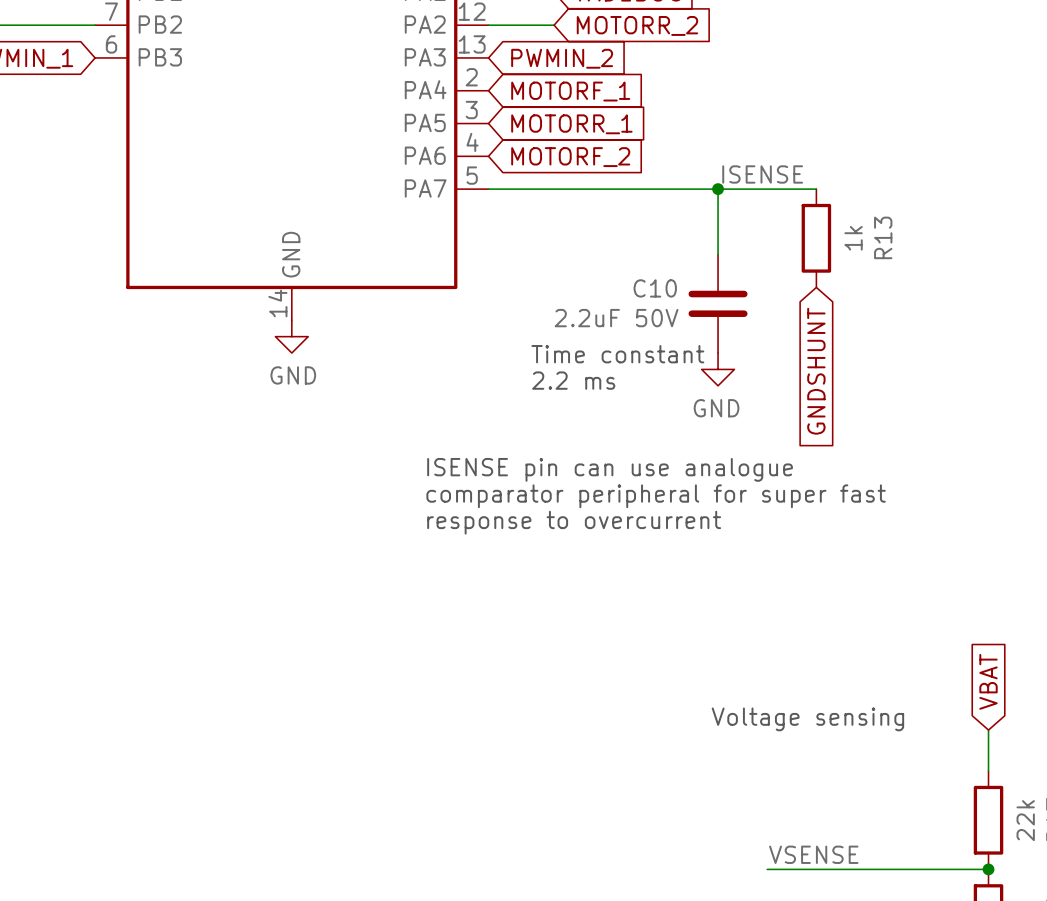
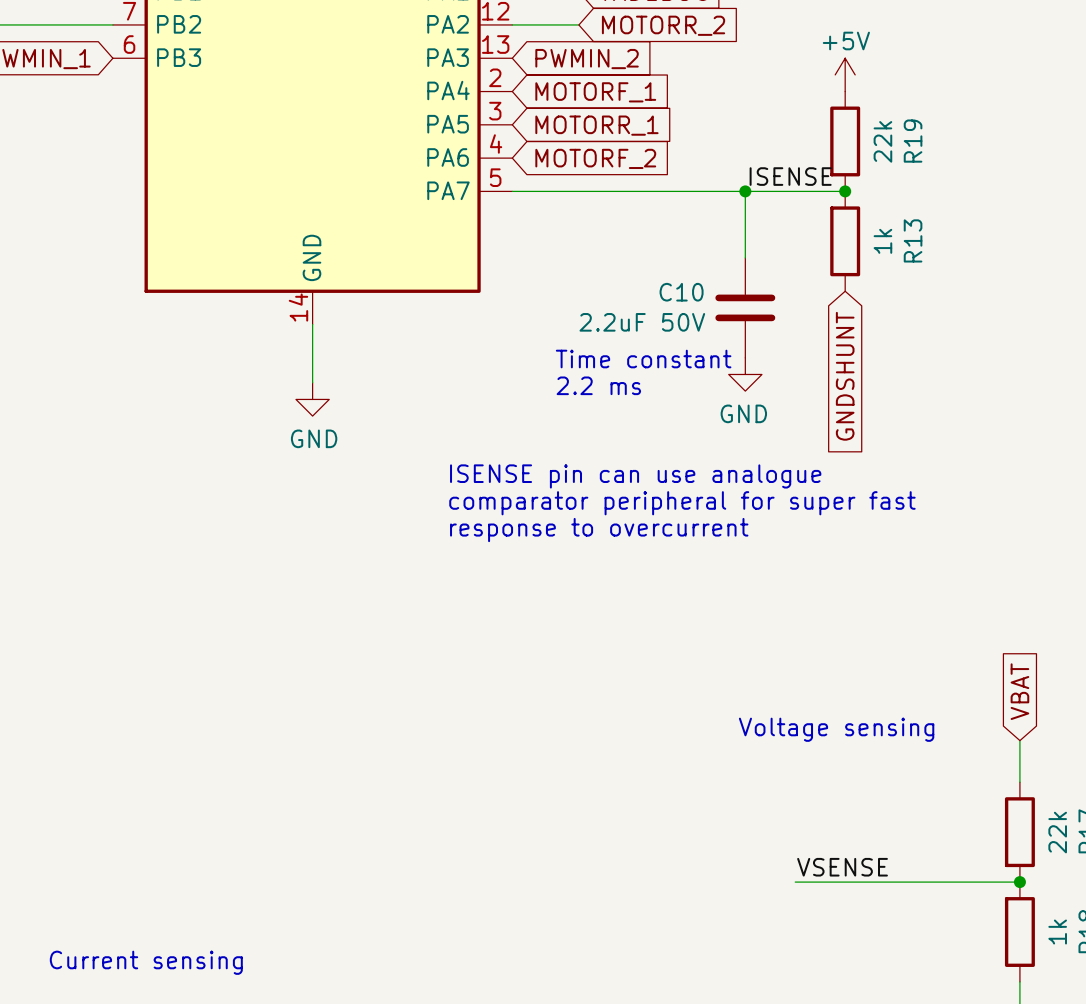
power symbol: none -> +5V (845, 74)
R19: none -> 22k (845, 141)
junction: none -> (845, 191)
wire: none -> (312, 324) (312, 382)
power symbol position: GND (291, 336) -> GND (312, 399)

